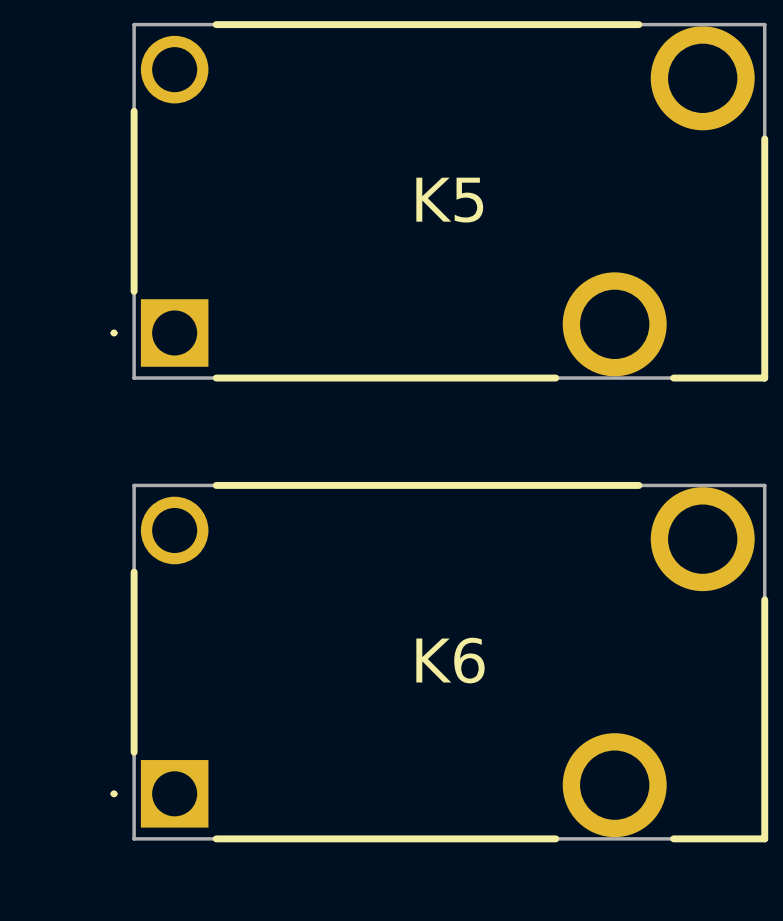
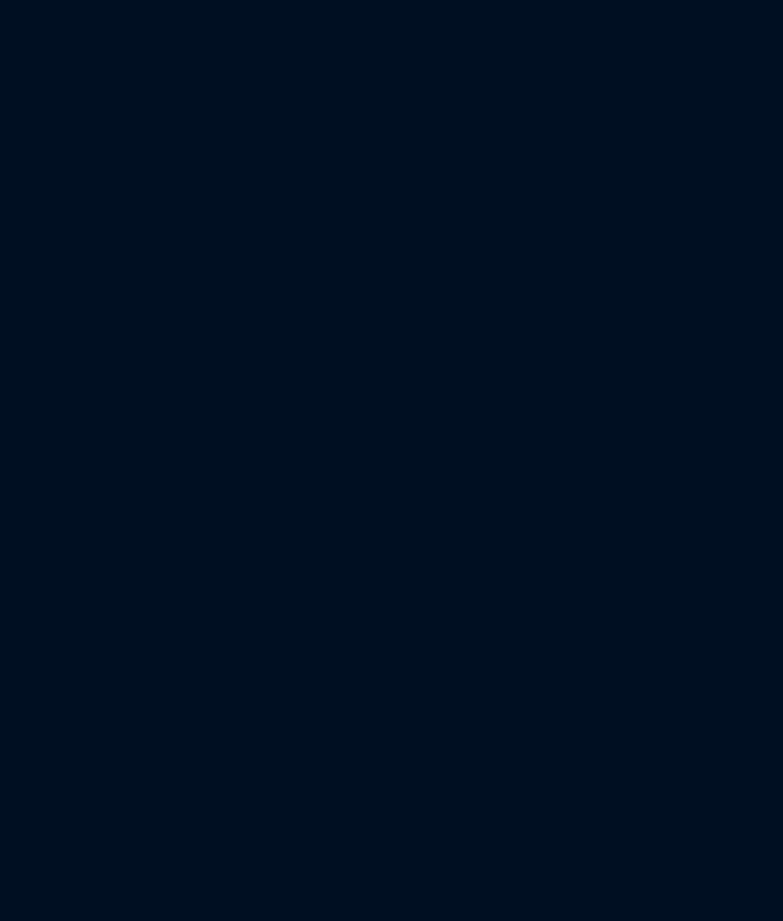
K5: (439, 201) -> none
K6: (439, 662) -> none

